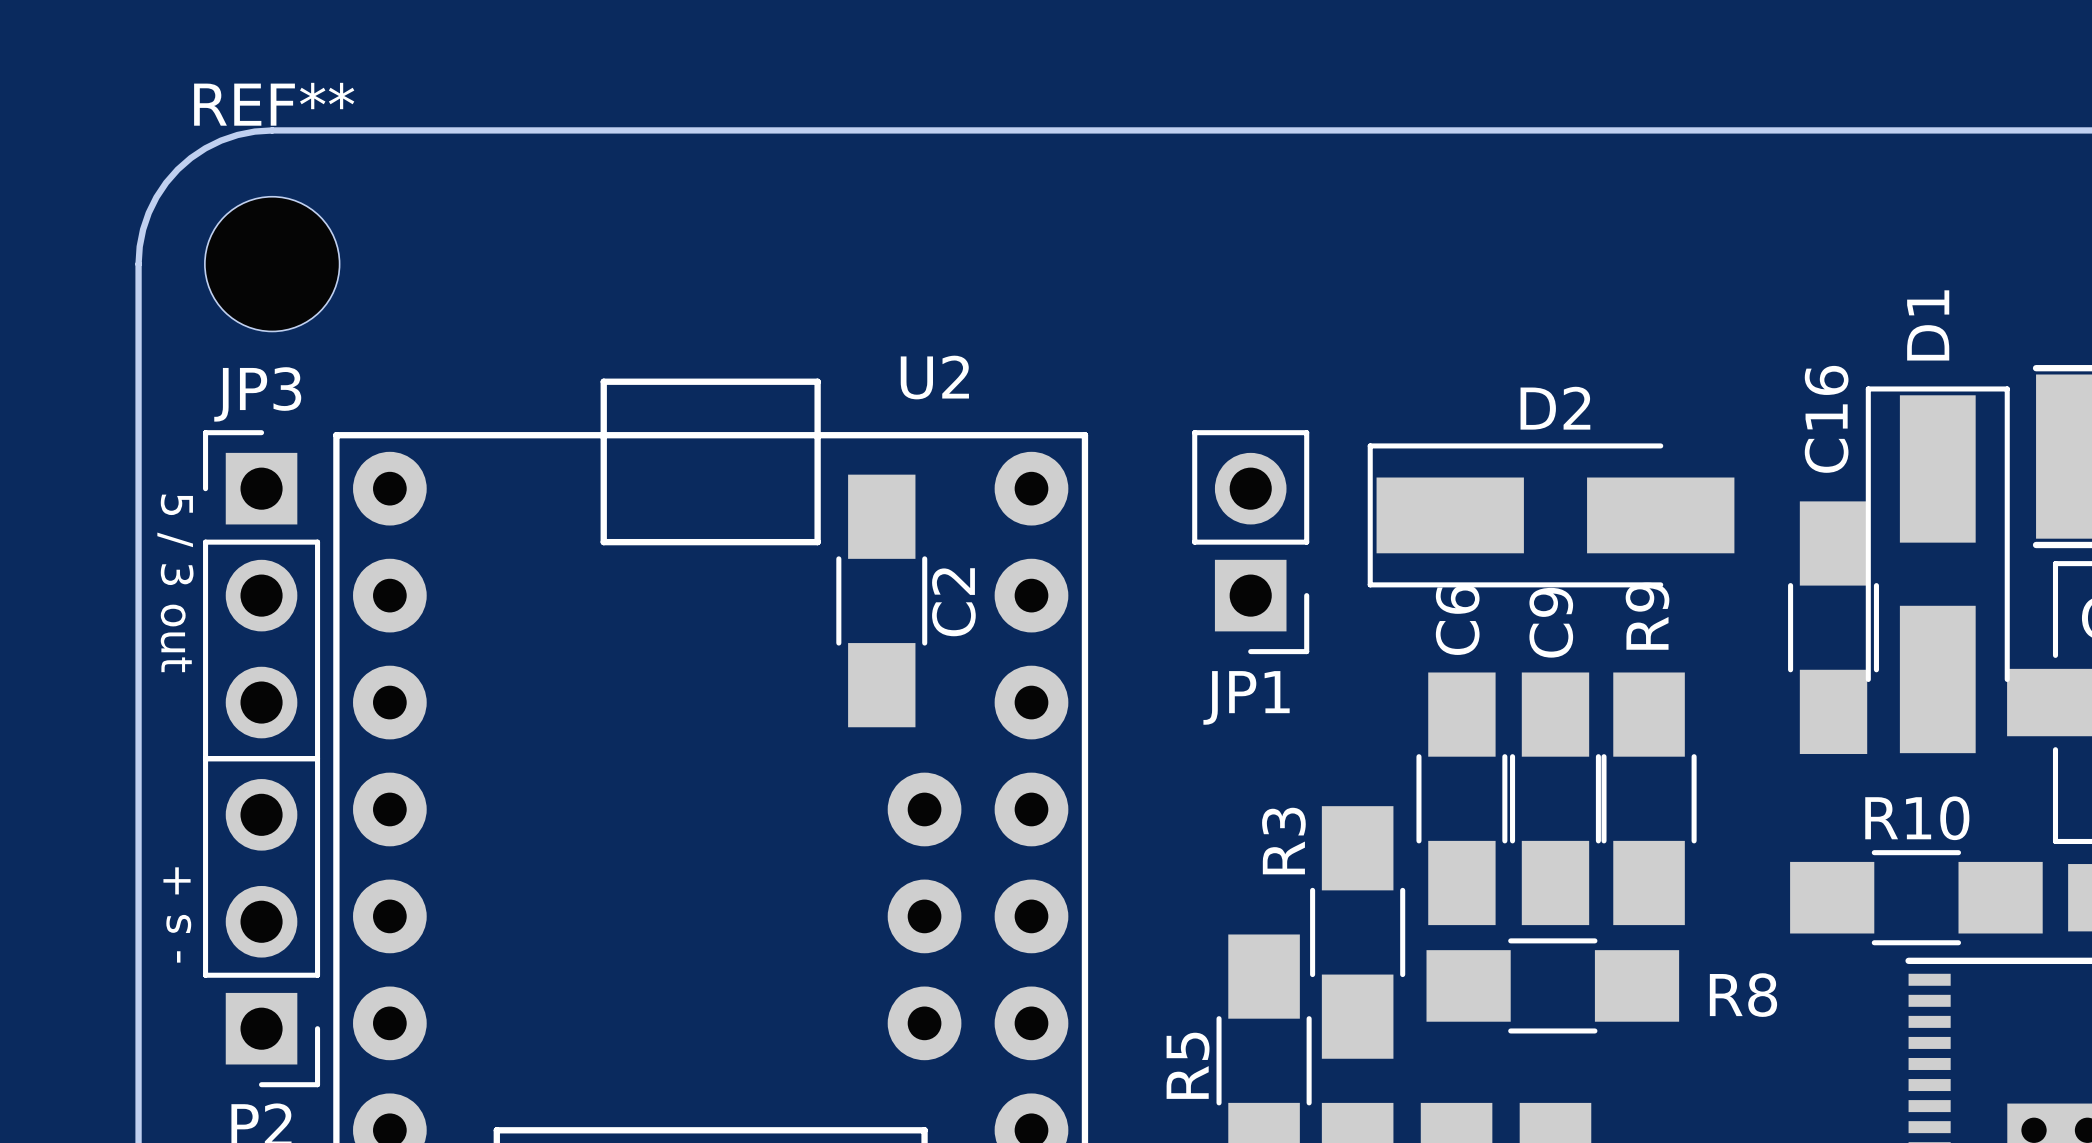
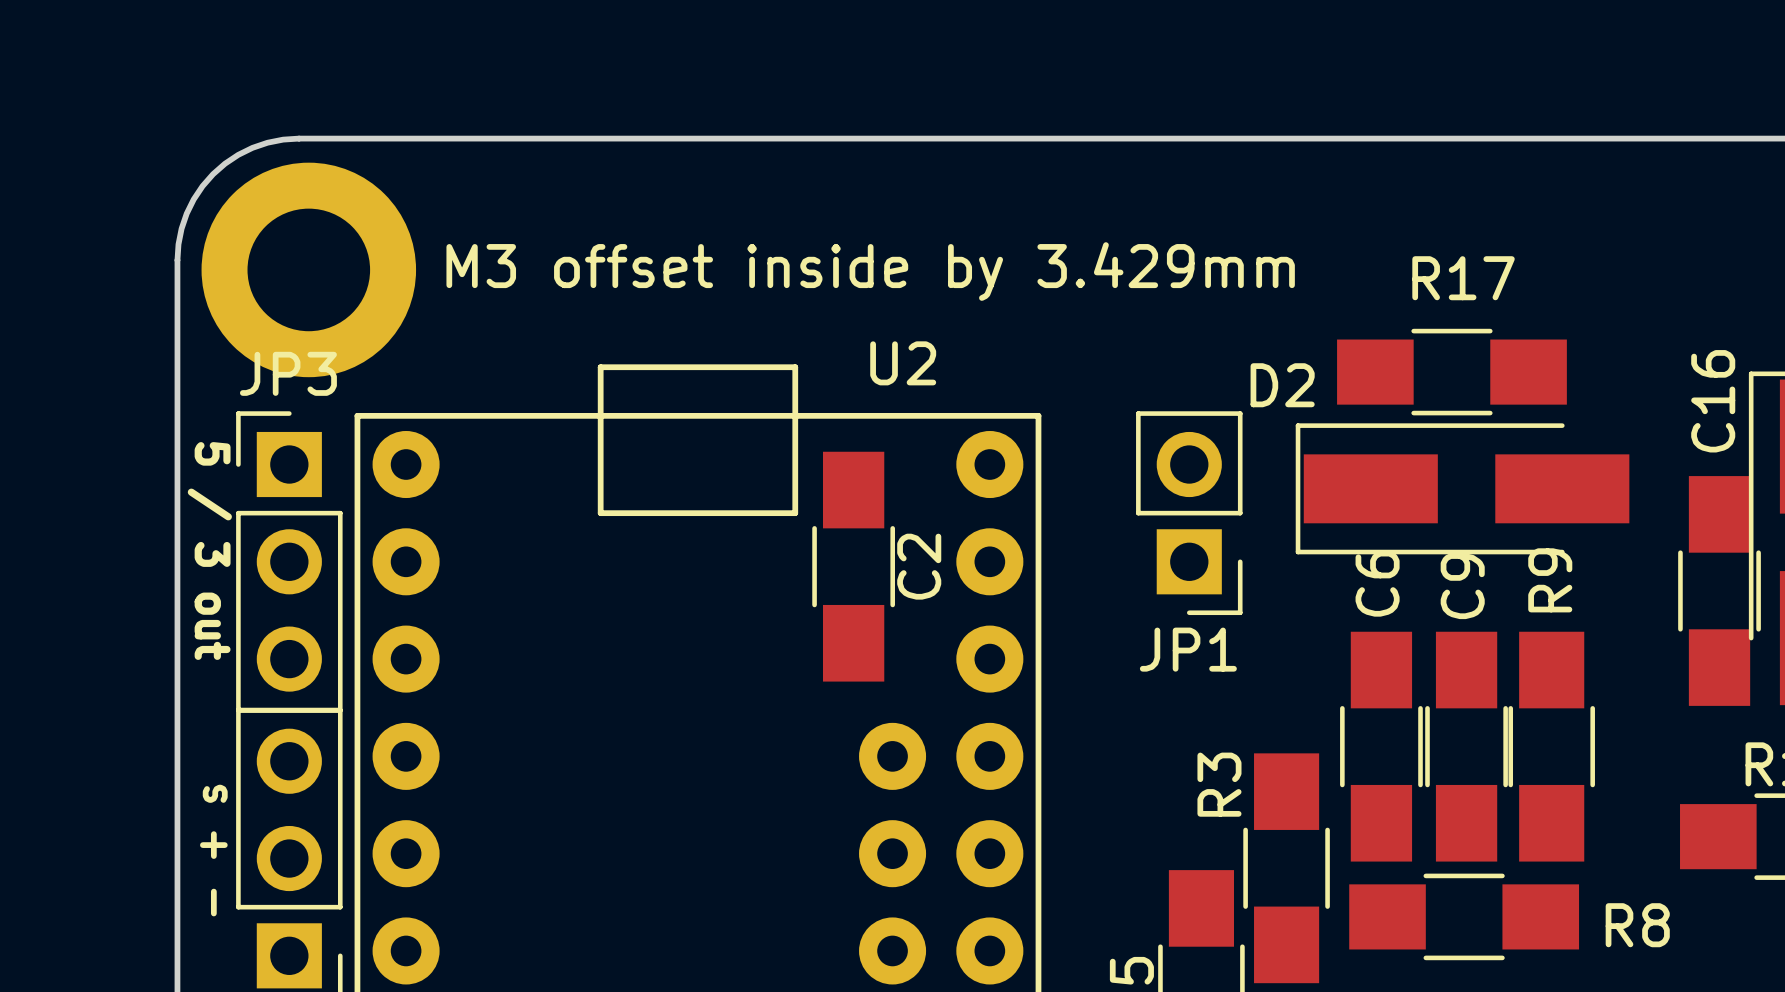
REF**: (272, 264) -> none
M3 offset inside by 3.429mm: none -> (308, 269)
R17: none -> (1451, 372)
D2 name position: D2 (1555, 408) -> D2 (1282, 385)
text: - s + (177, 914) -> - + s (213, 850)

